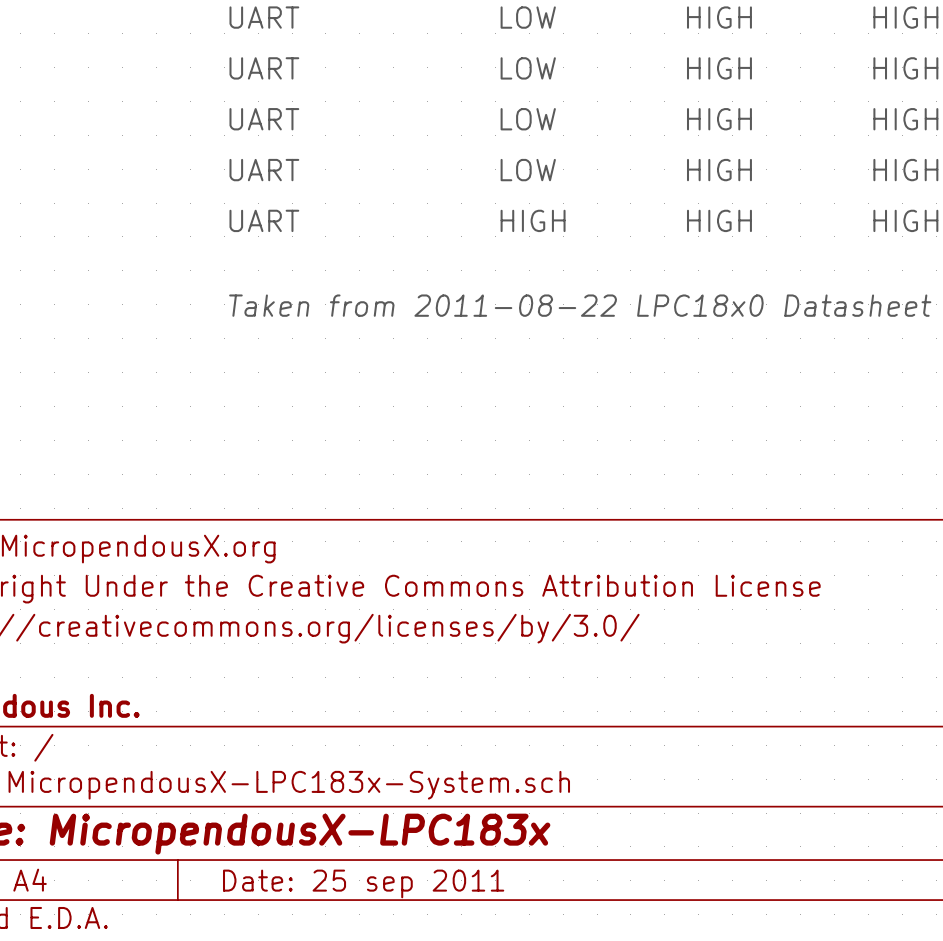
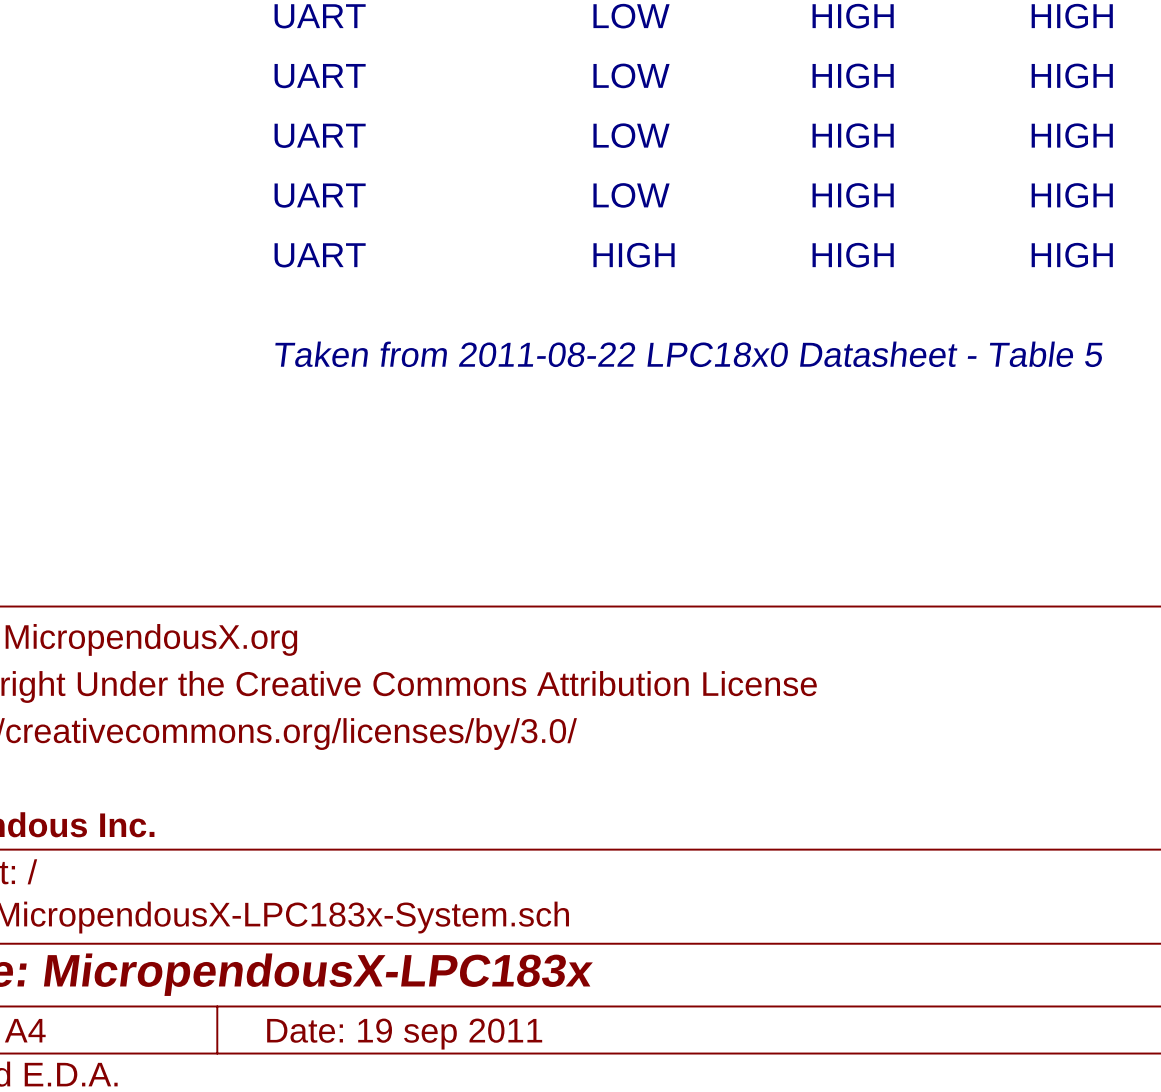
title block: Date: 25 sep 2011 (363, 883) -> Date: 19 sep 2011 (404, 1034)

